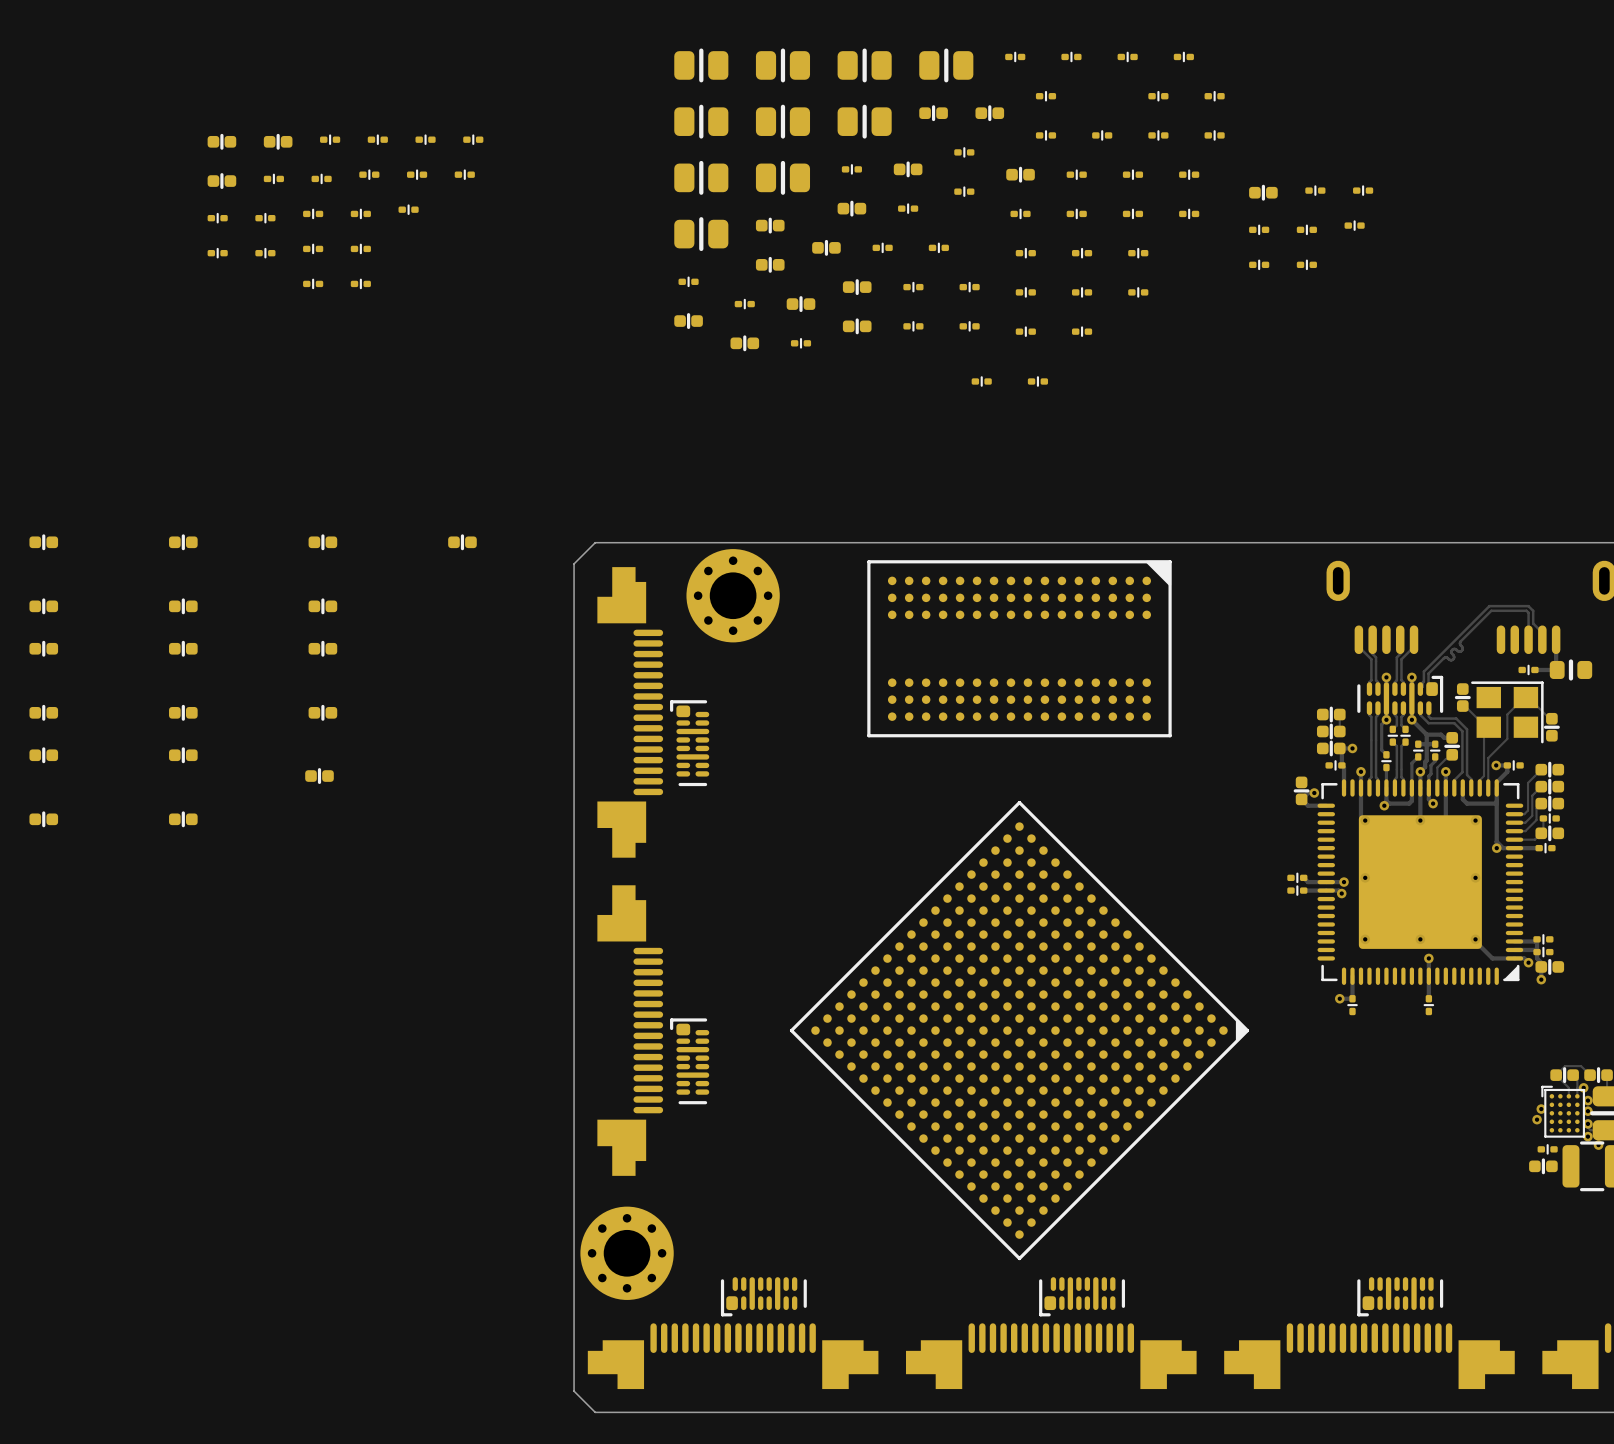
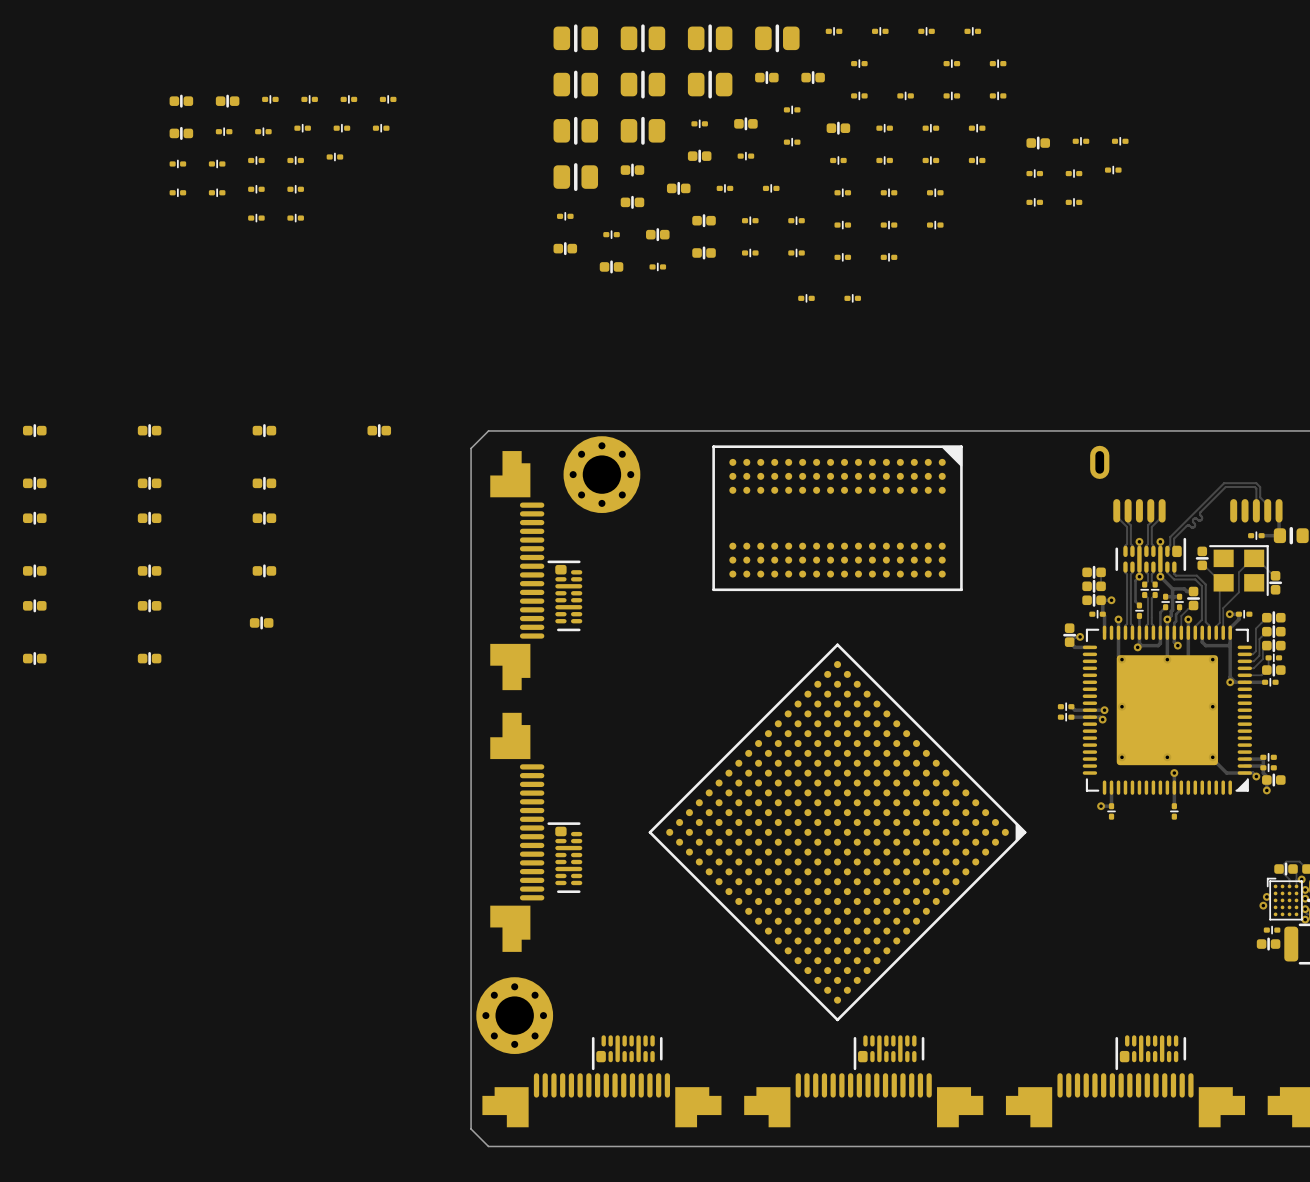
part footprint: [1357, 675, 1444, 716] -> [1115, 537, 1187, 573]
part footprint: [670, 700, 710, 787] -> [547, 560, 583, 632]
part footprint: [670, 1018, 710, 1105] -> [547, 822, 583, 894]
part footprint: [720, 1277, 807, 1317] -> [591, 1035, 663, 1071]
part footprint: [1039, 1277, 1126, 1317] -> [853, 1035, 925, 1071]
part footprint: [1357, 1277, 1444, 1317] -> [1115, 1035, 1187, 1071]

